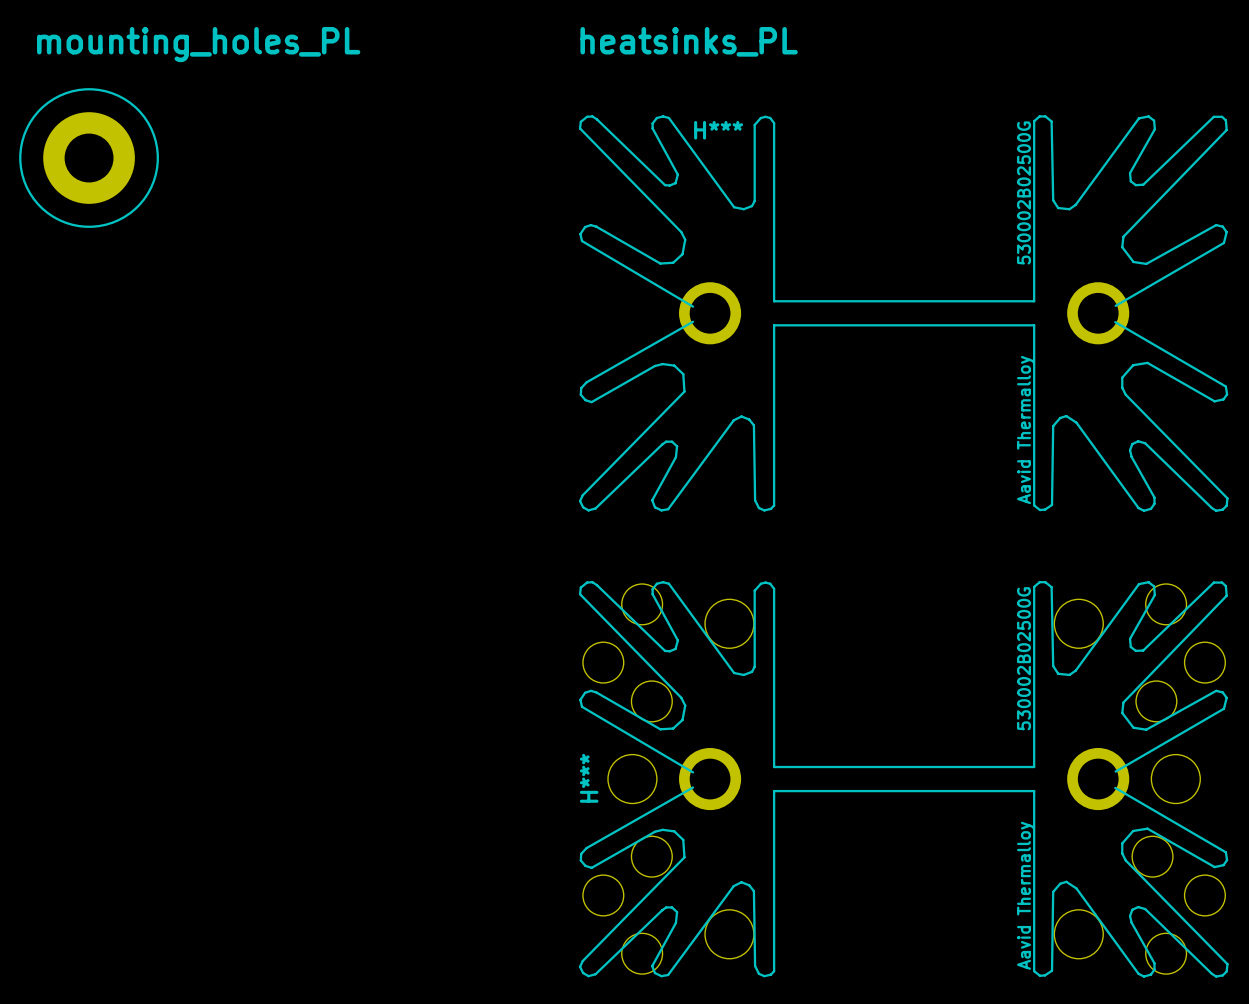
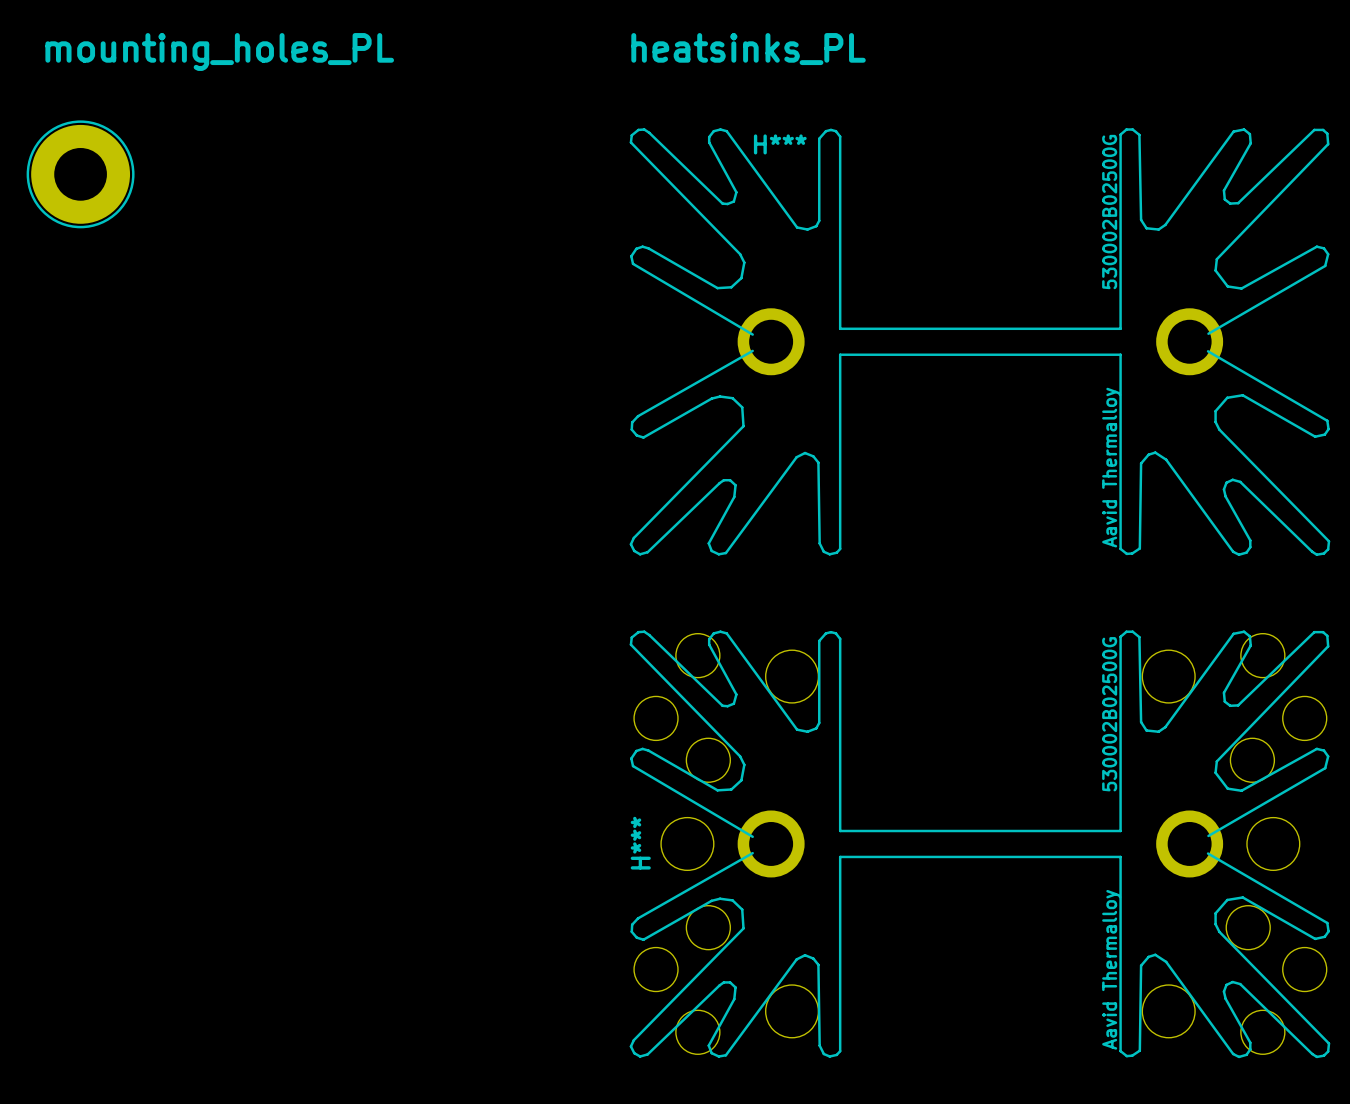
part: none -> (80, 174)
part: (89, 158) -> none

